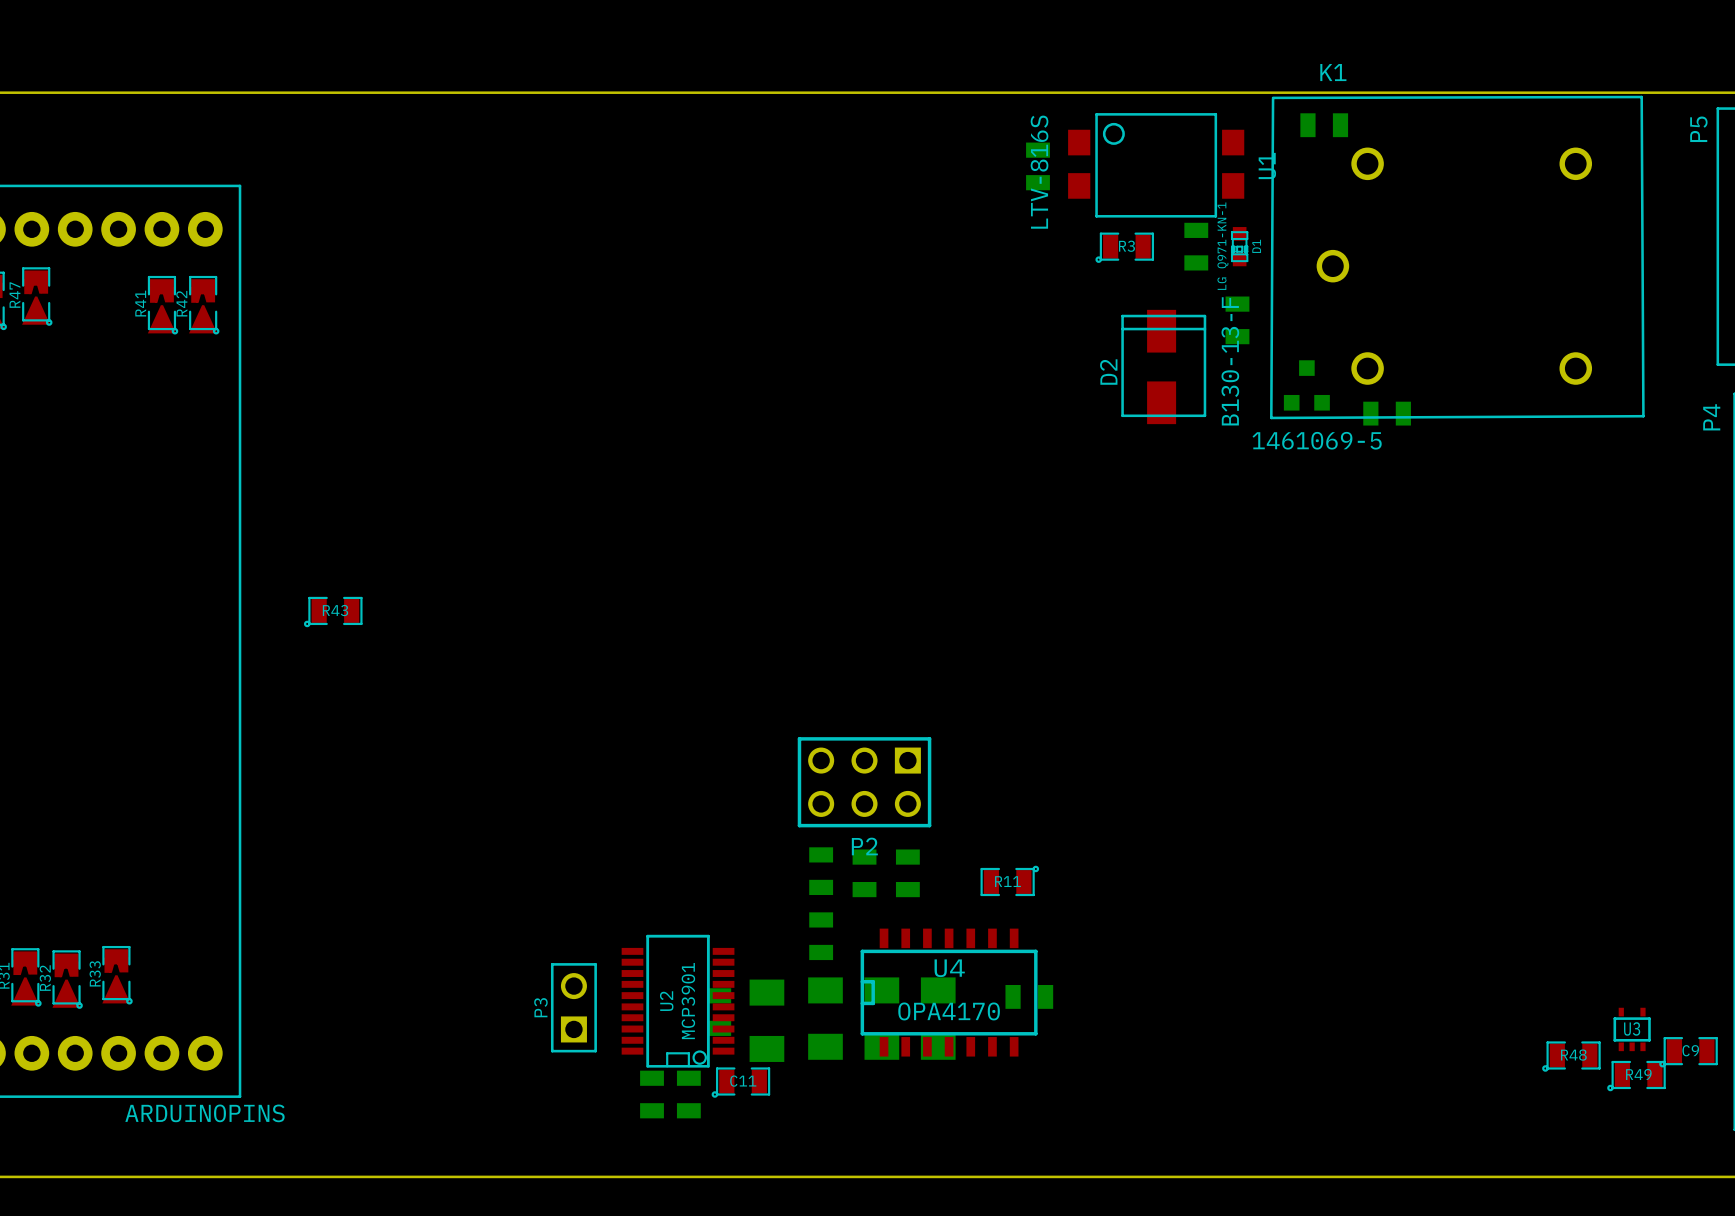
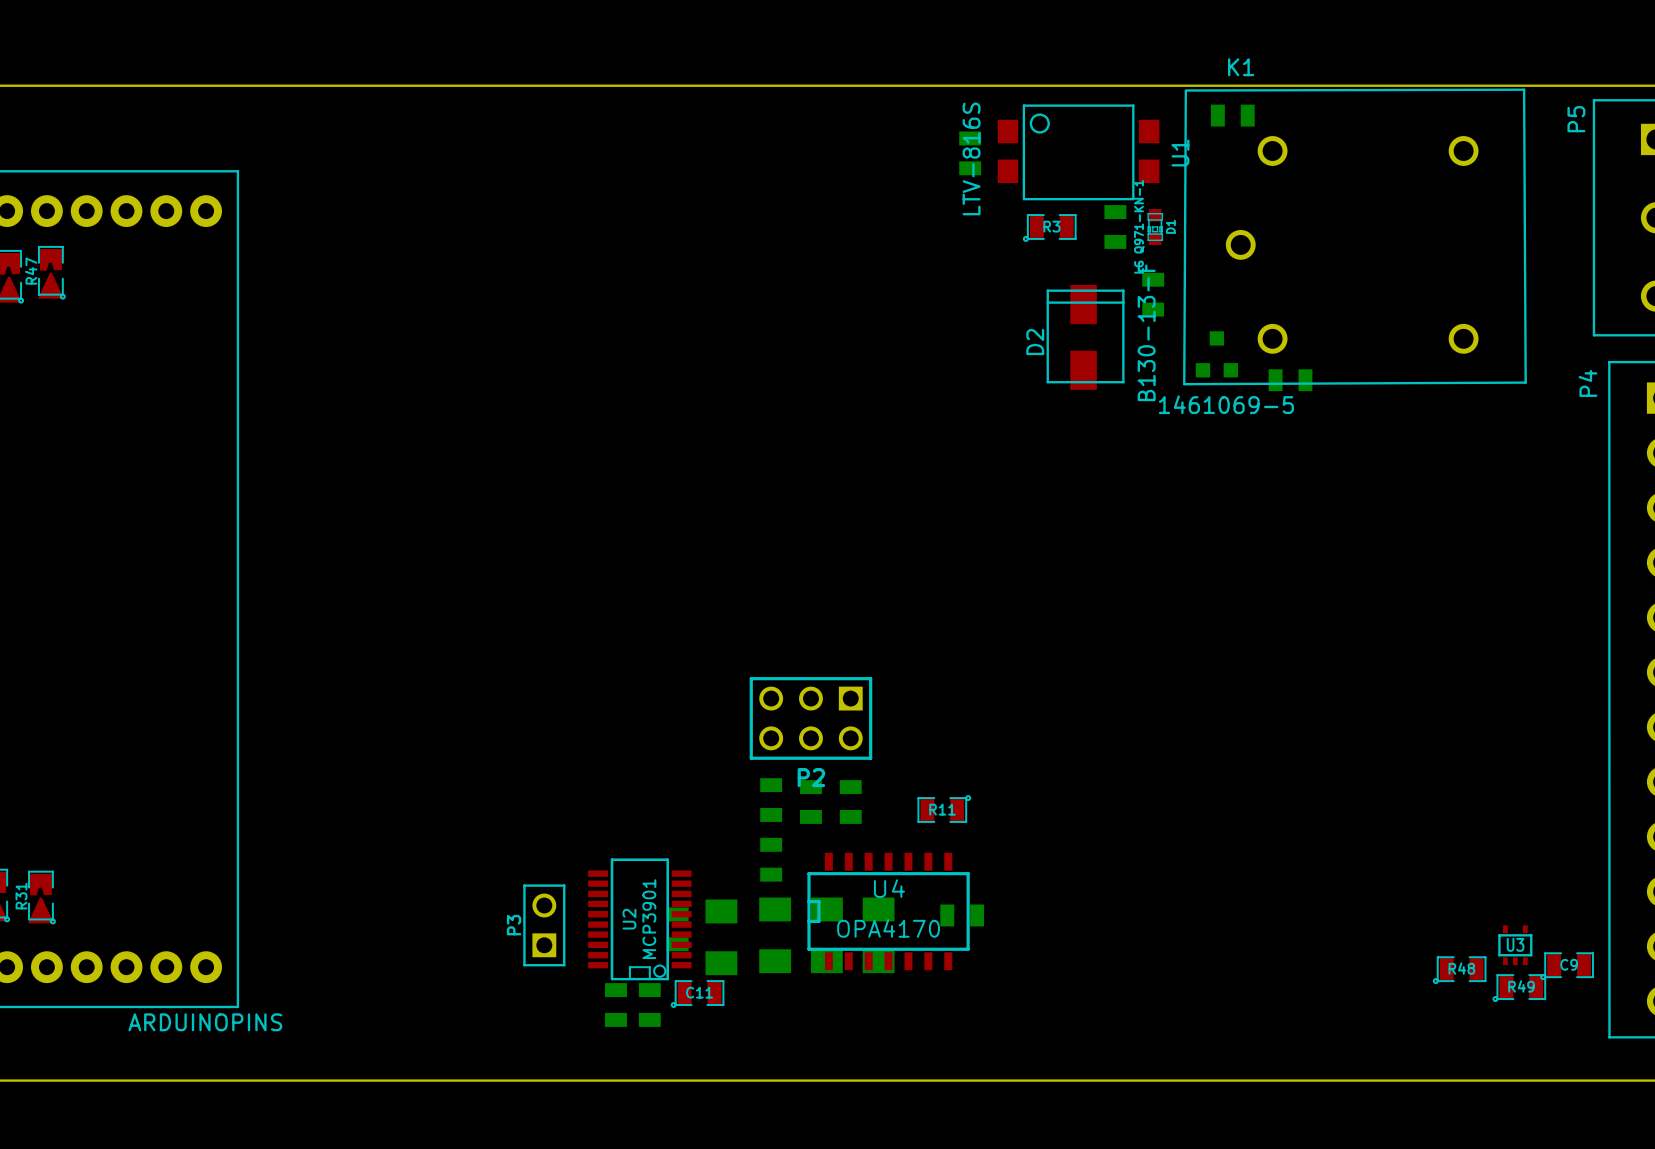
R41: (163, 305) -> none
R42: (204, 305) -> none
R43: (333, 612) -> none
R33: (117, 975) -> none
R32: (67, 979) -> none

